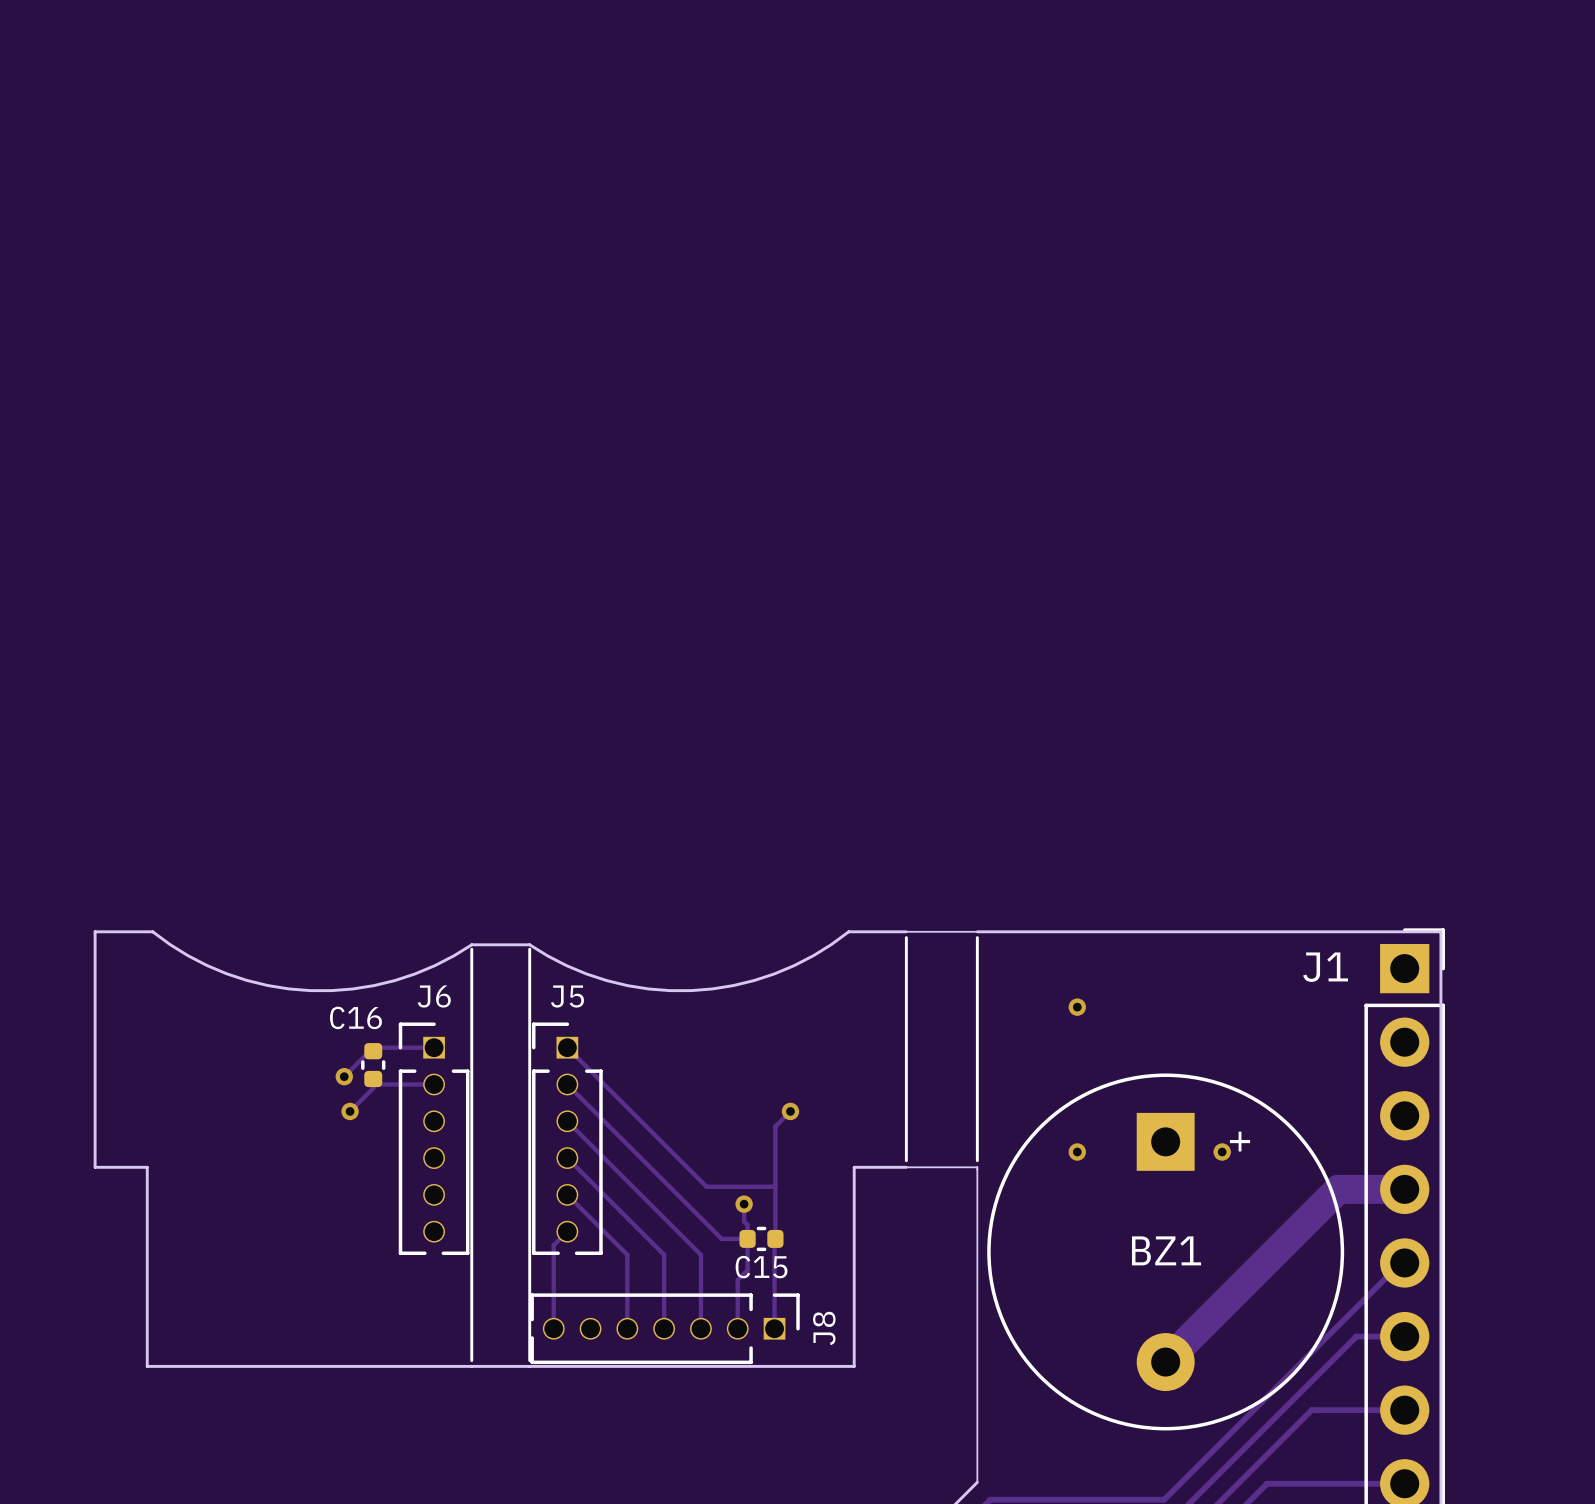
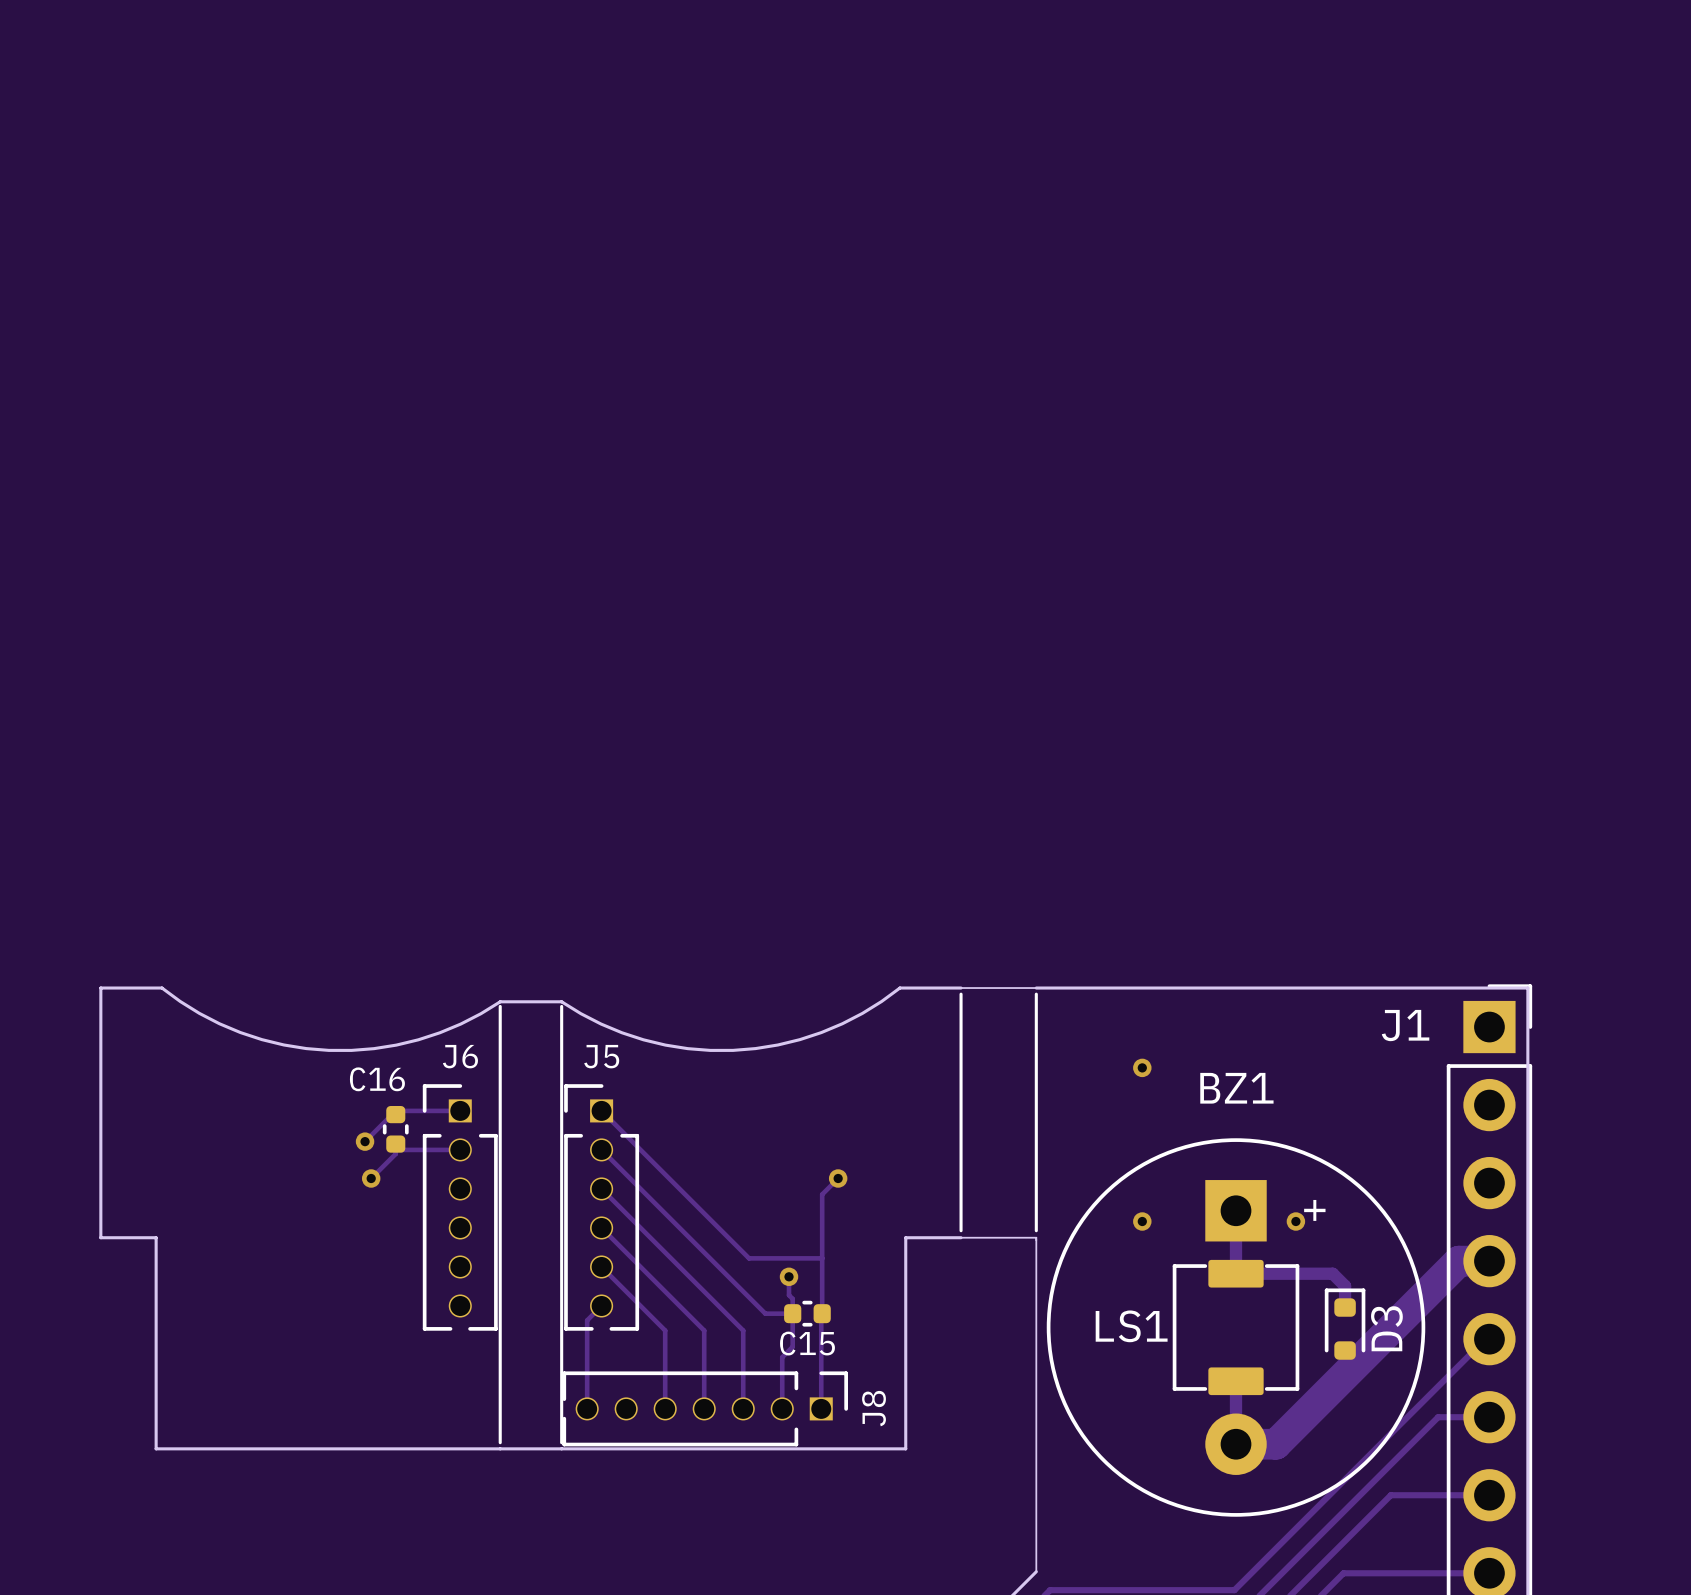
track: none -> (1236, 1210) (1236, 1273) (1332, 1273) (1345, 1286) (1345, 1307)
track: (1376, 1189) (1338, 1189) (1165, 1362) -> (1459, 1261) (1275, 1444) (1236, 1444) (1236, 1381)
D3: none -> (1345, 1324)
BZ1 name position: BZ1 (1166, 1250) -> BZ1 (1236, 1088)
LS1: none -> (1236, 1327)

